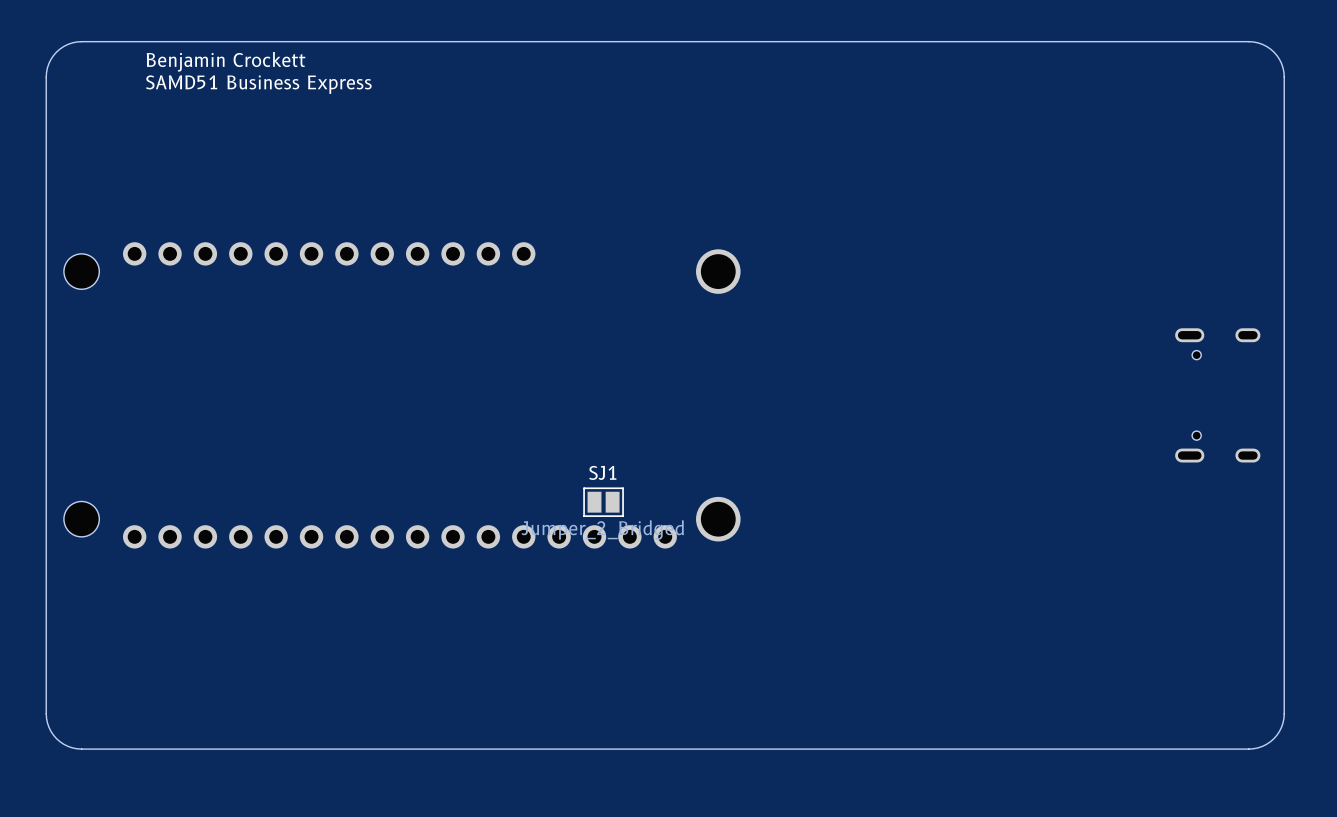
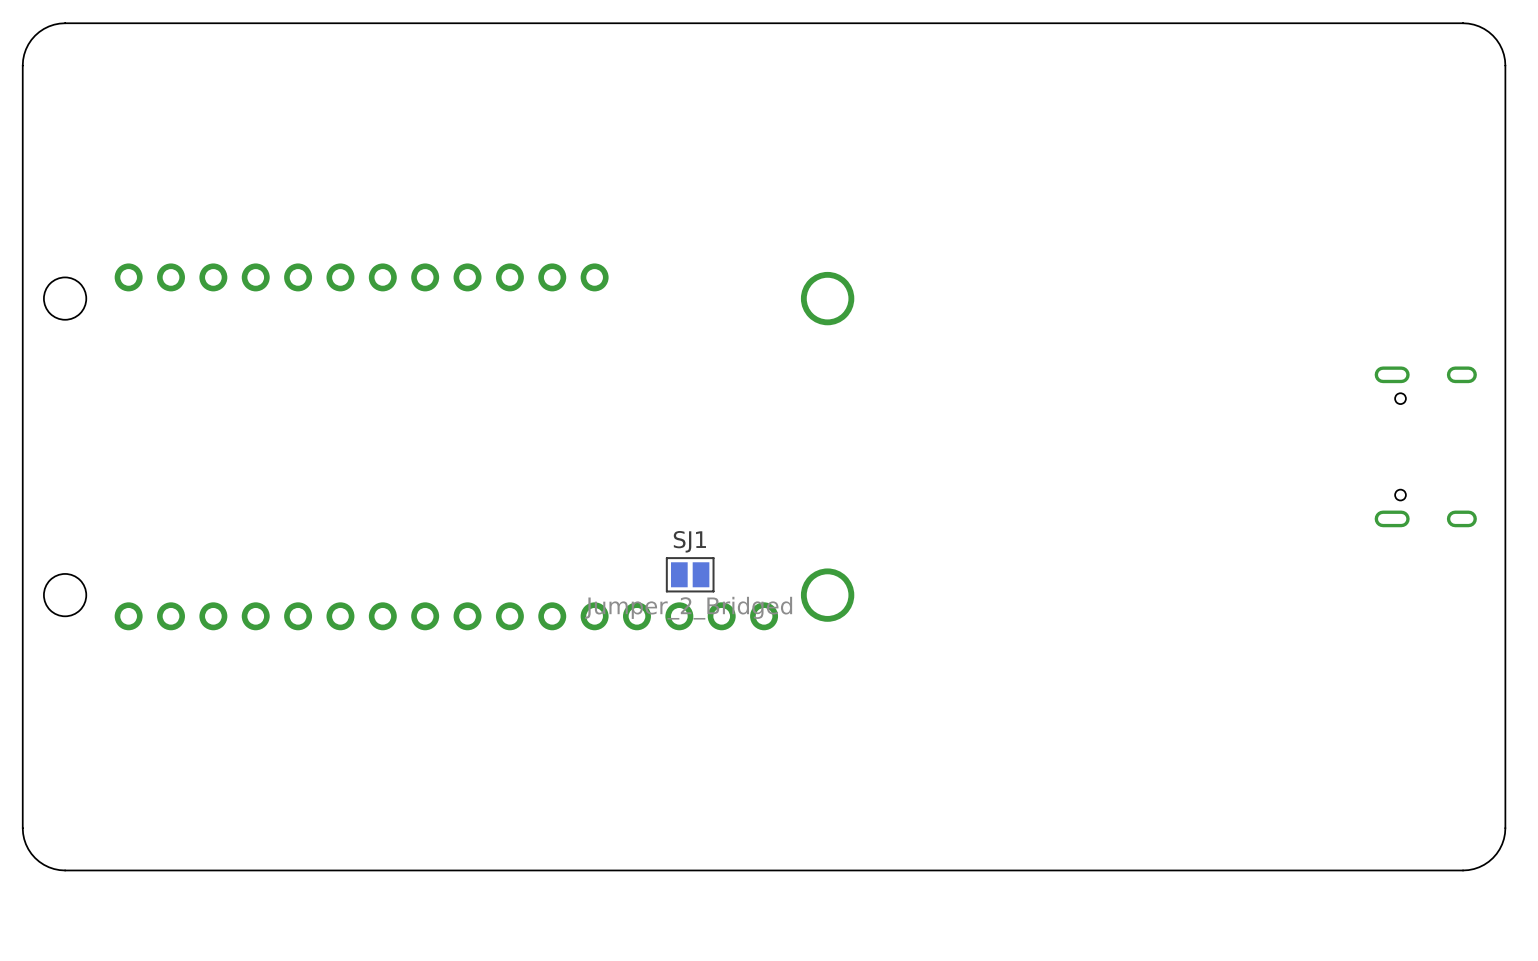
text: Benjamin Crockett (226, 61) -> none
text: SAMD51 Business Express (258, 84) -> none

